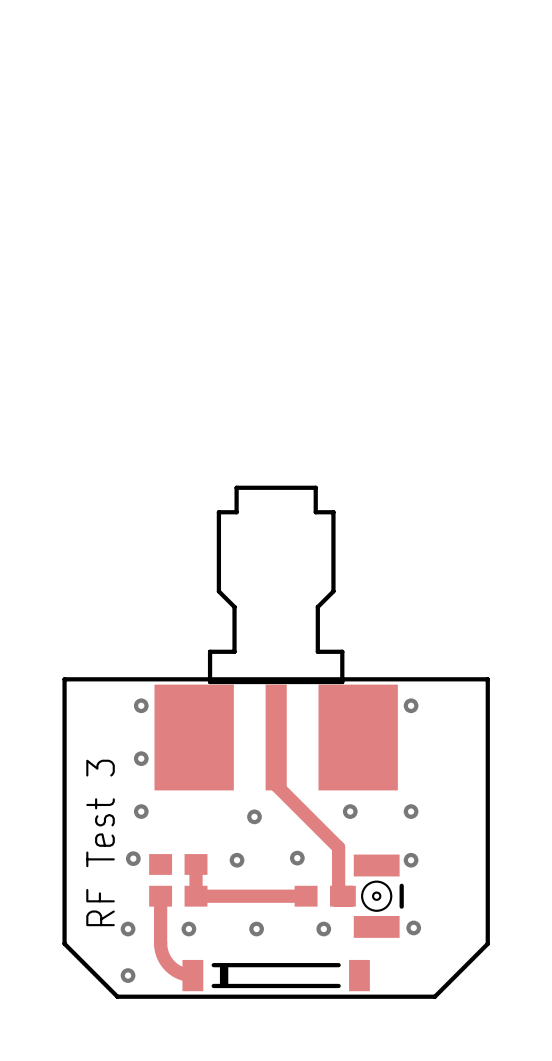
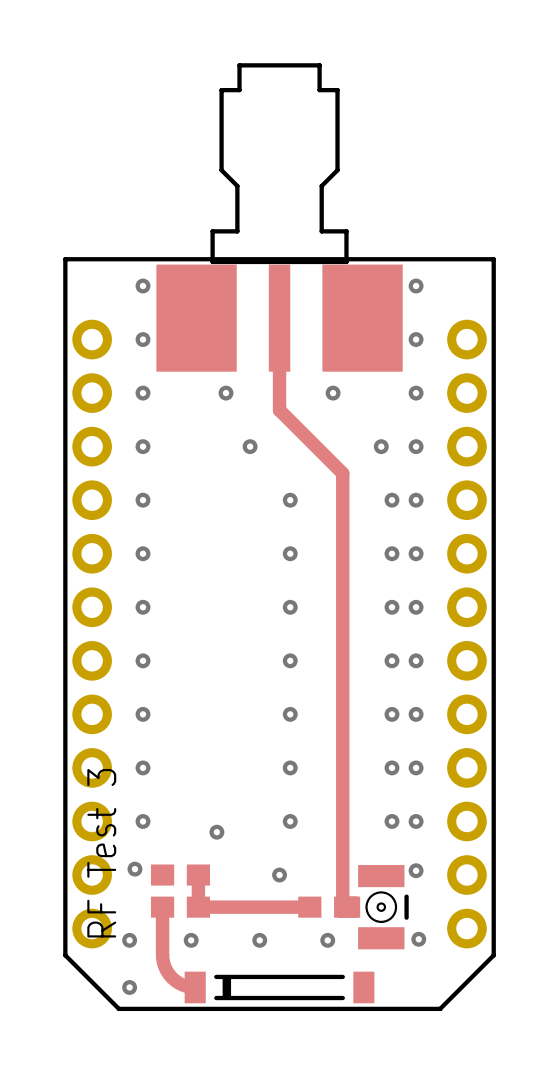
via: none -> (143, 286)
via: none -> (416, 286)
via: none -> (143, 339)
via: none -> (416, 339)
via: none -> (143, 393)
via: none -> (226, 393)
via: none -> (333, 393)
via: none -> (416, 393)
via: none -> (143, 446)
via: none -> (250, 446)
via: none -> (381, 446)
via: none -> (416, 446)
via: none -> (143, 500)
via: none -> (290, 500)
via: none -> (391, 500)
via: none -> (416, 500)
via: none -> (143, 553)
via: none -> (290, 553)
via: none -> (391, 553)
via: none -> (416, 553)
via: none -> (143, 607)
via: none -> (290, 607)
via: none -> (391, 607)
via: none -> (416, 607)
part: none -> (92, 634)
part: none -> (466, 634)
part position: (276, 638) -> (279, 217)
via: none -> (143, 660)
via: none -> (290, 660)
via: none -> (391, 660)
via: none -> (416, 660)
board edge: (64, 679) (487, 679) -> (65, 687) (65, 259) (493, 259) (493, 687)
via: none -> (290, 714)
via: none -> (391, 714)
track: (276, 737) (276, 785) (338, 847) -> (279, 318) (279, 410) (342, 473) (342, 857)
via: none -> (290, 767)
via: none -> (391, 767)
via: none -> (416, 767)
via: none -> (290, 821)
via: (350, 811) -> none
via: none -> (391, 821)
via: (254, 816) -> none
via: none -> (216, 832)
via: (297, 858) -> none
via: (237, 860) -> none
via: none -> (279, 875)

